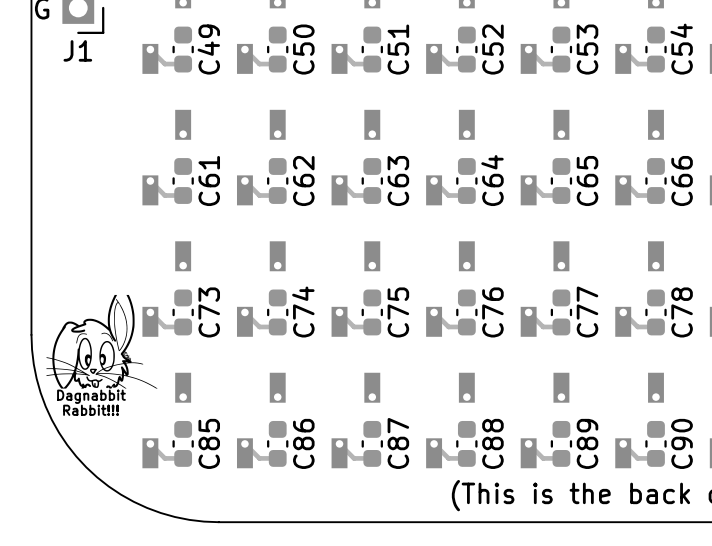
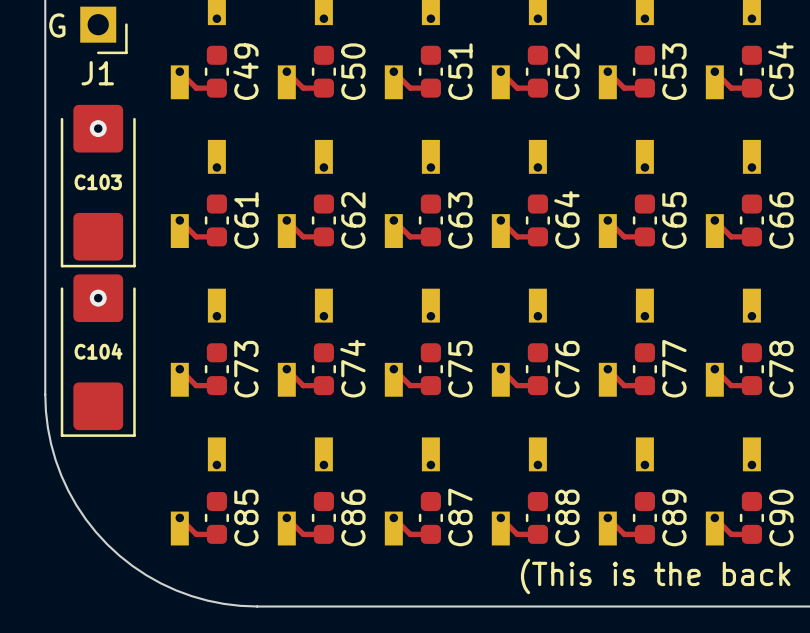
via: none -> (98, 128)
C103: none -> (98, 186)
via: none -> (98, 298)
drawing: [46, 294, 158, 389] -> none
C104: none -> (98, 355)

